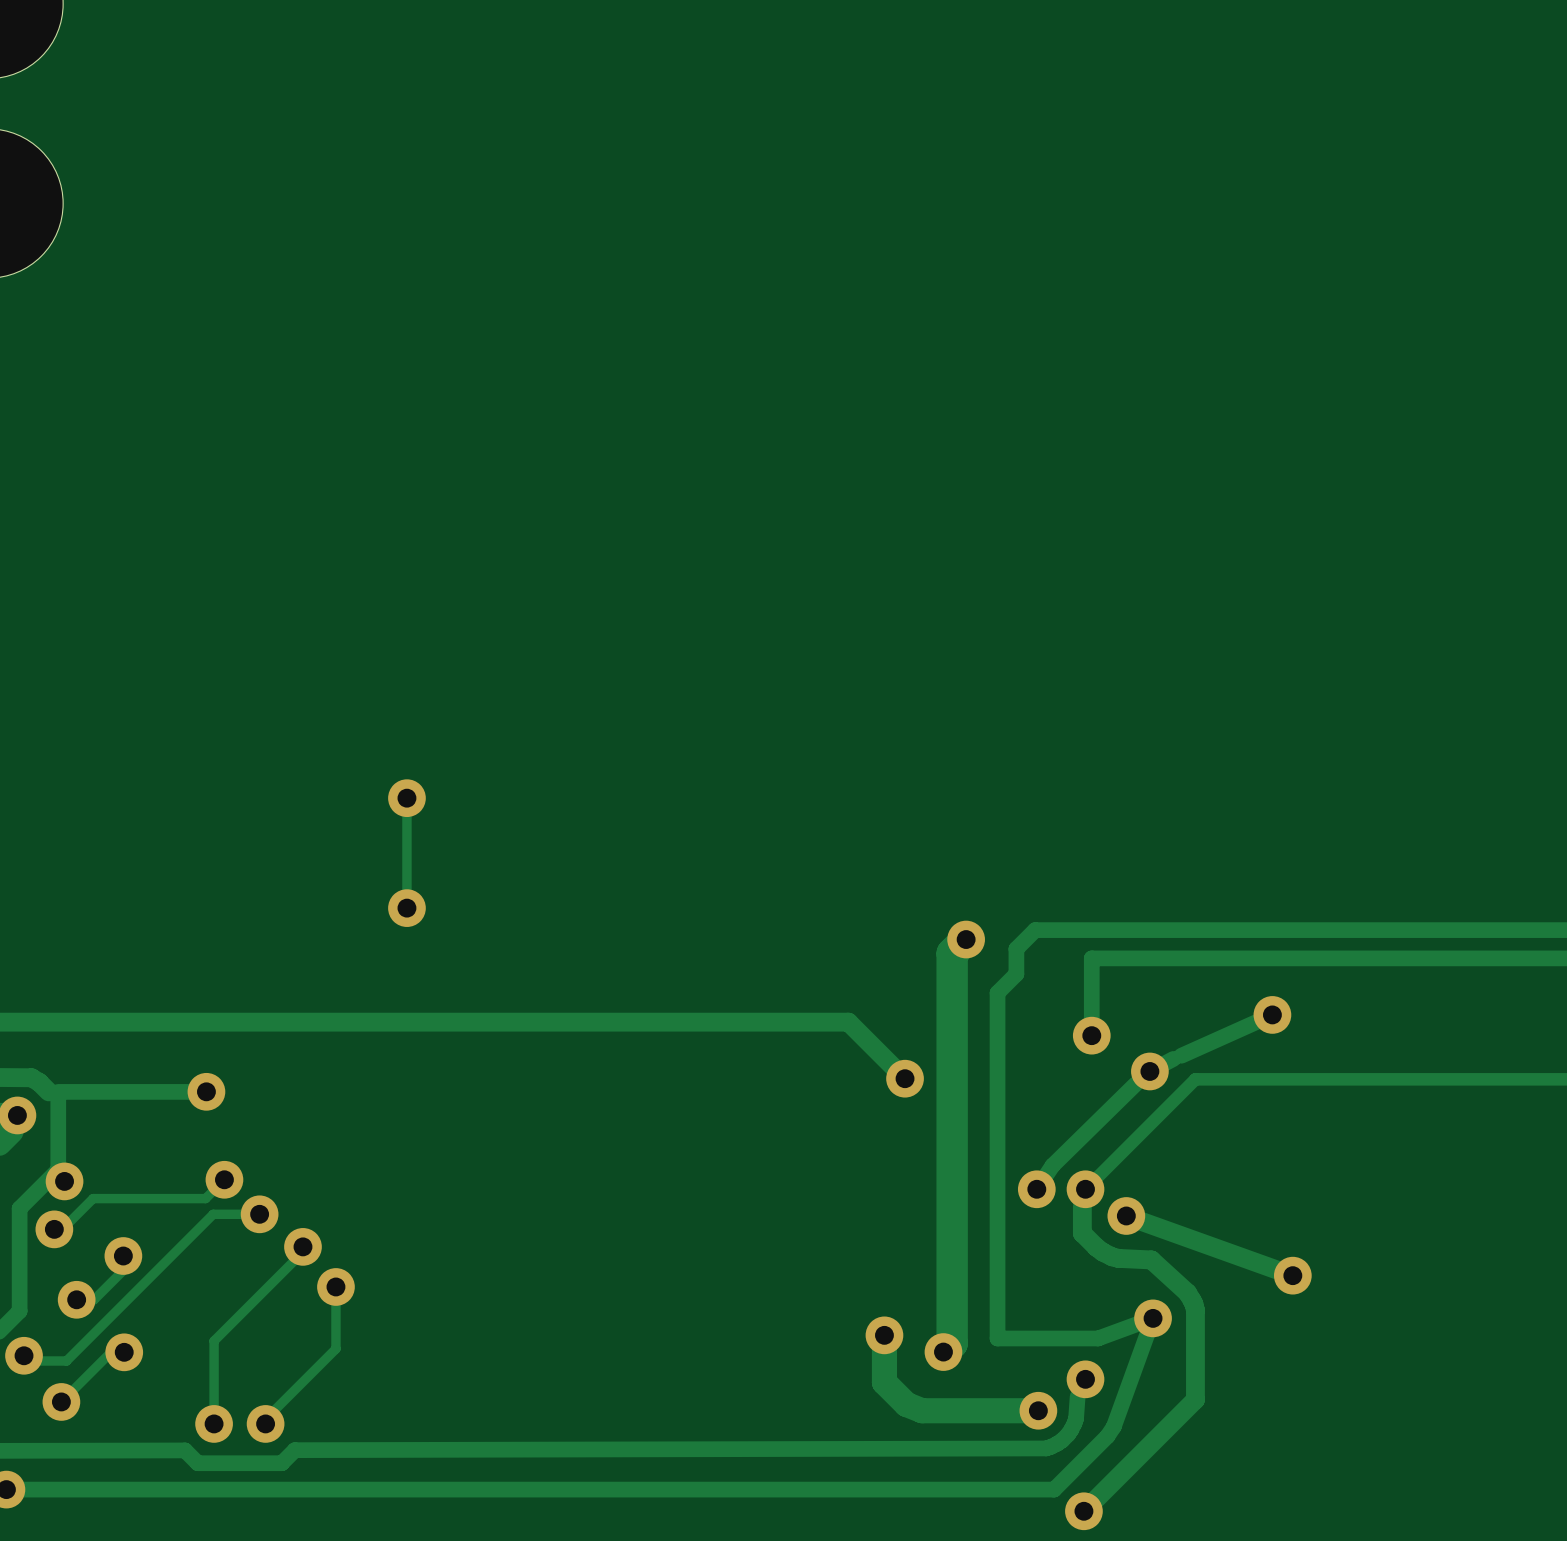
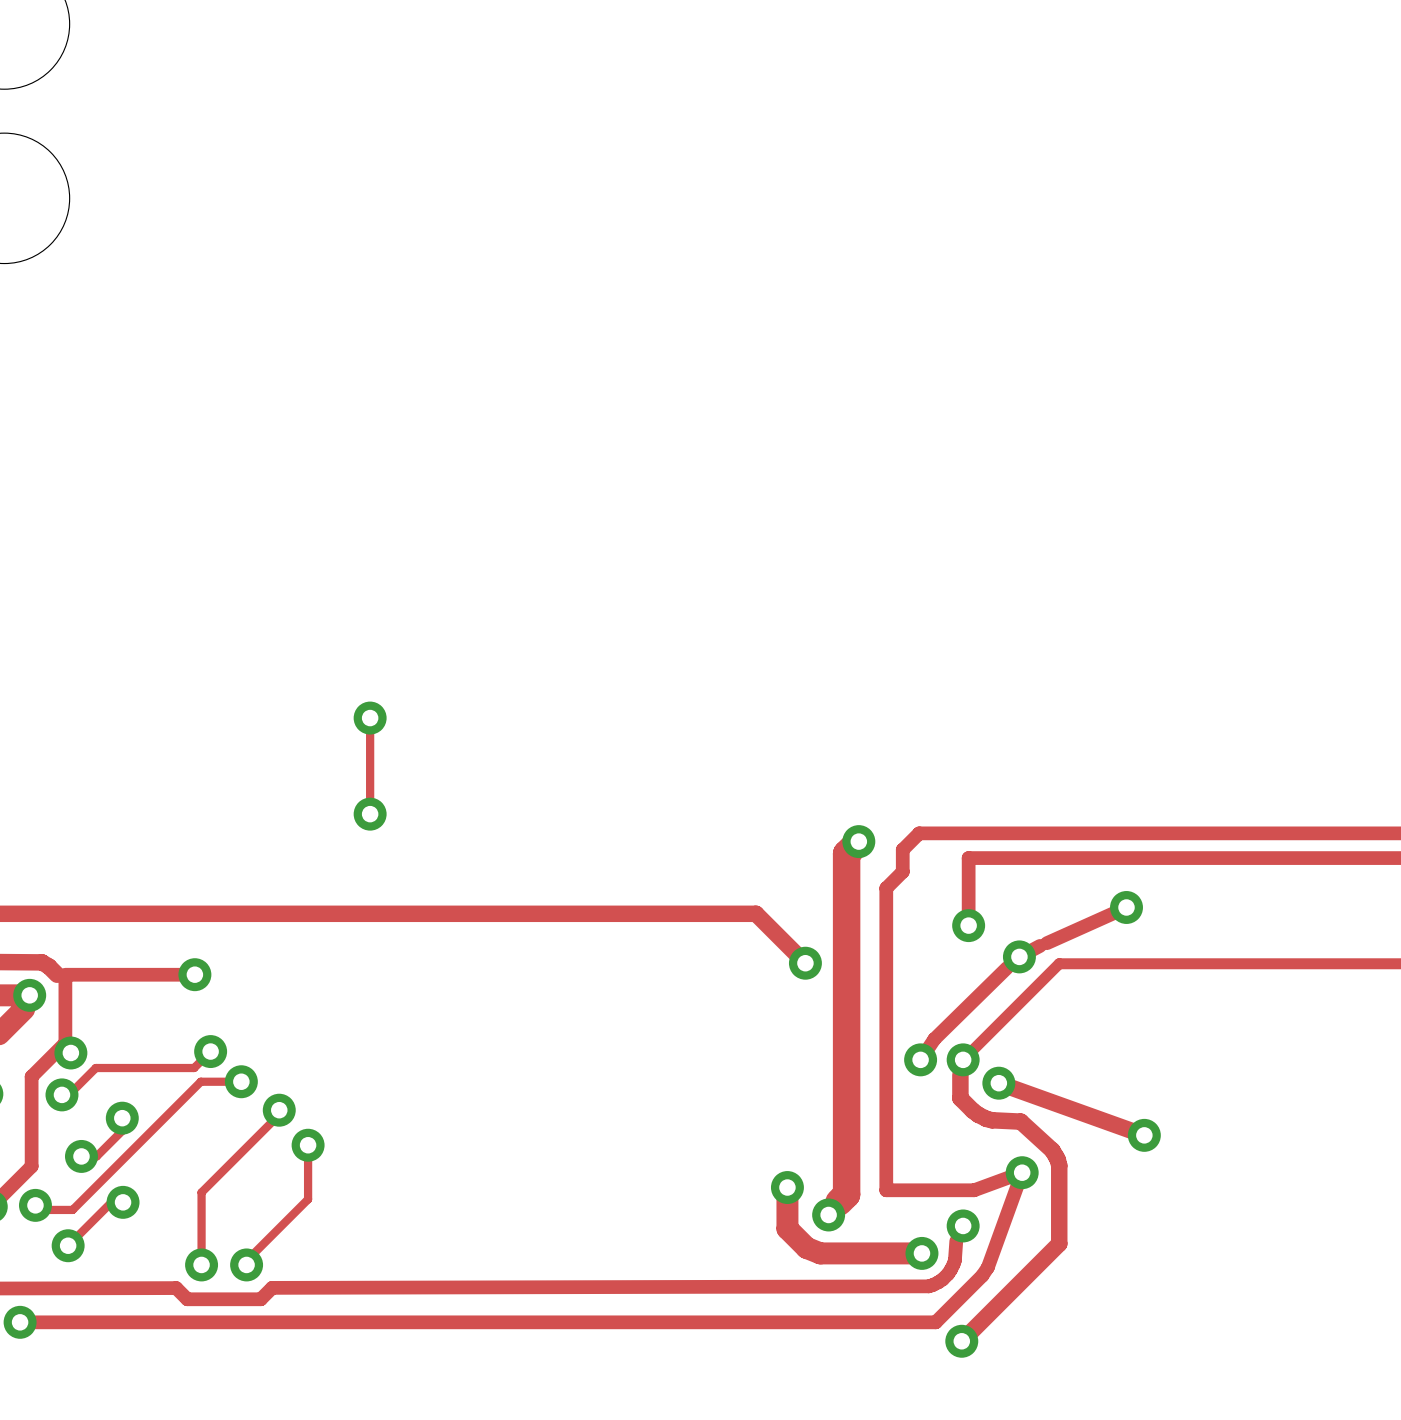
via position: (943, 1352) -> (828, 1214)

